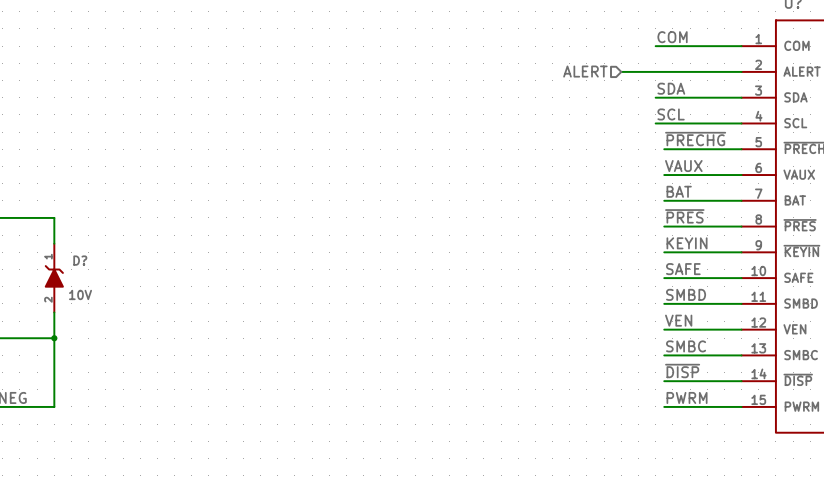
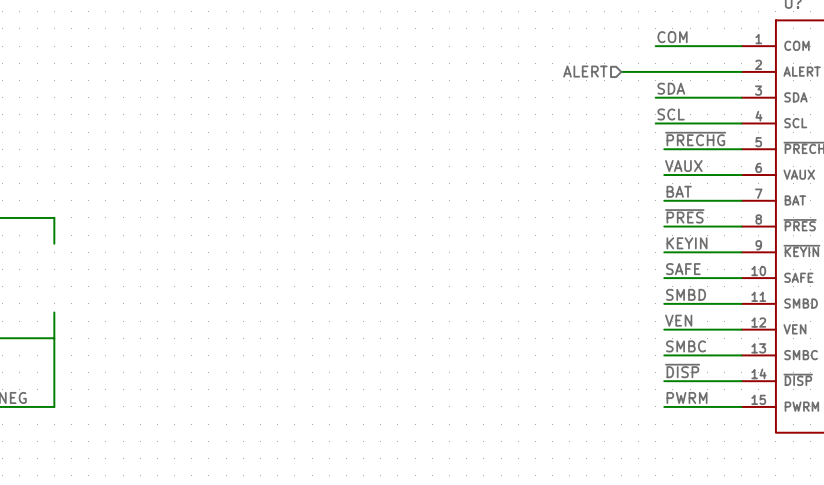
D?: 10V (54, 278) -> none
junction: (54, 338) -> none

